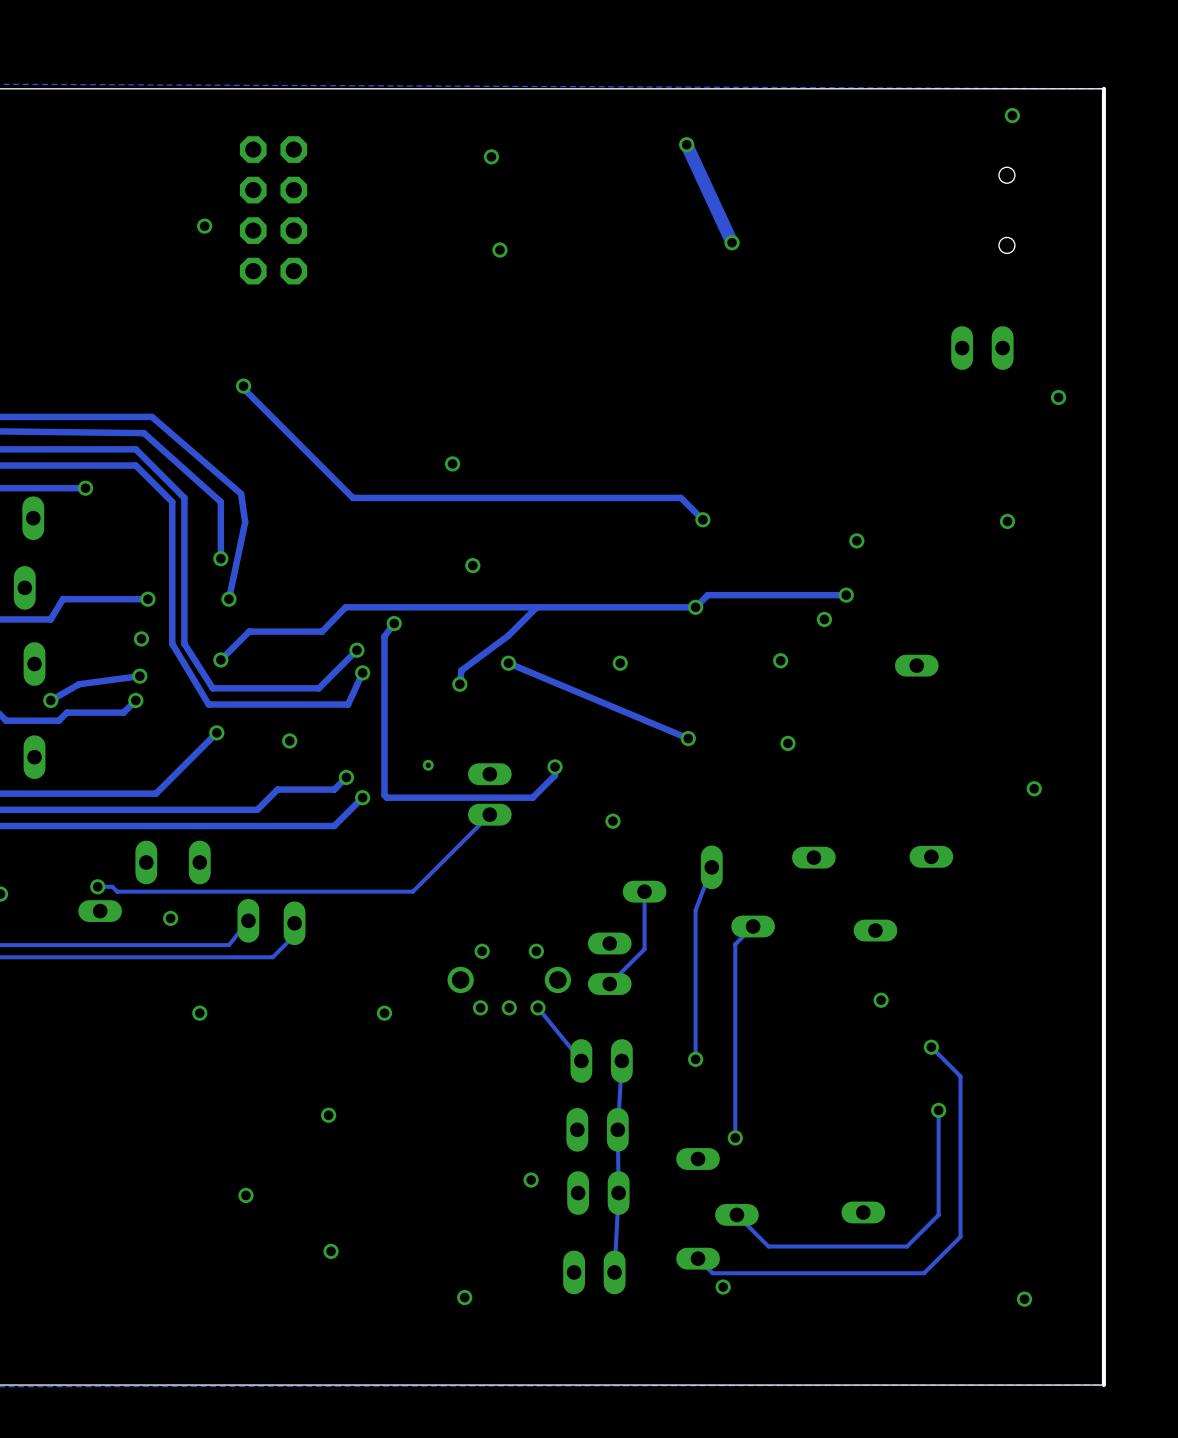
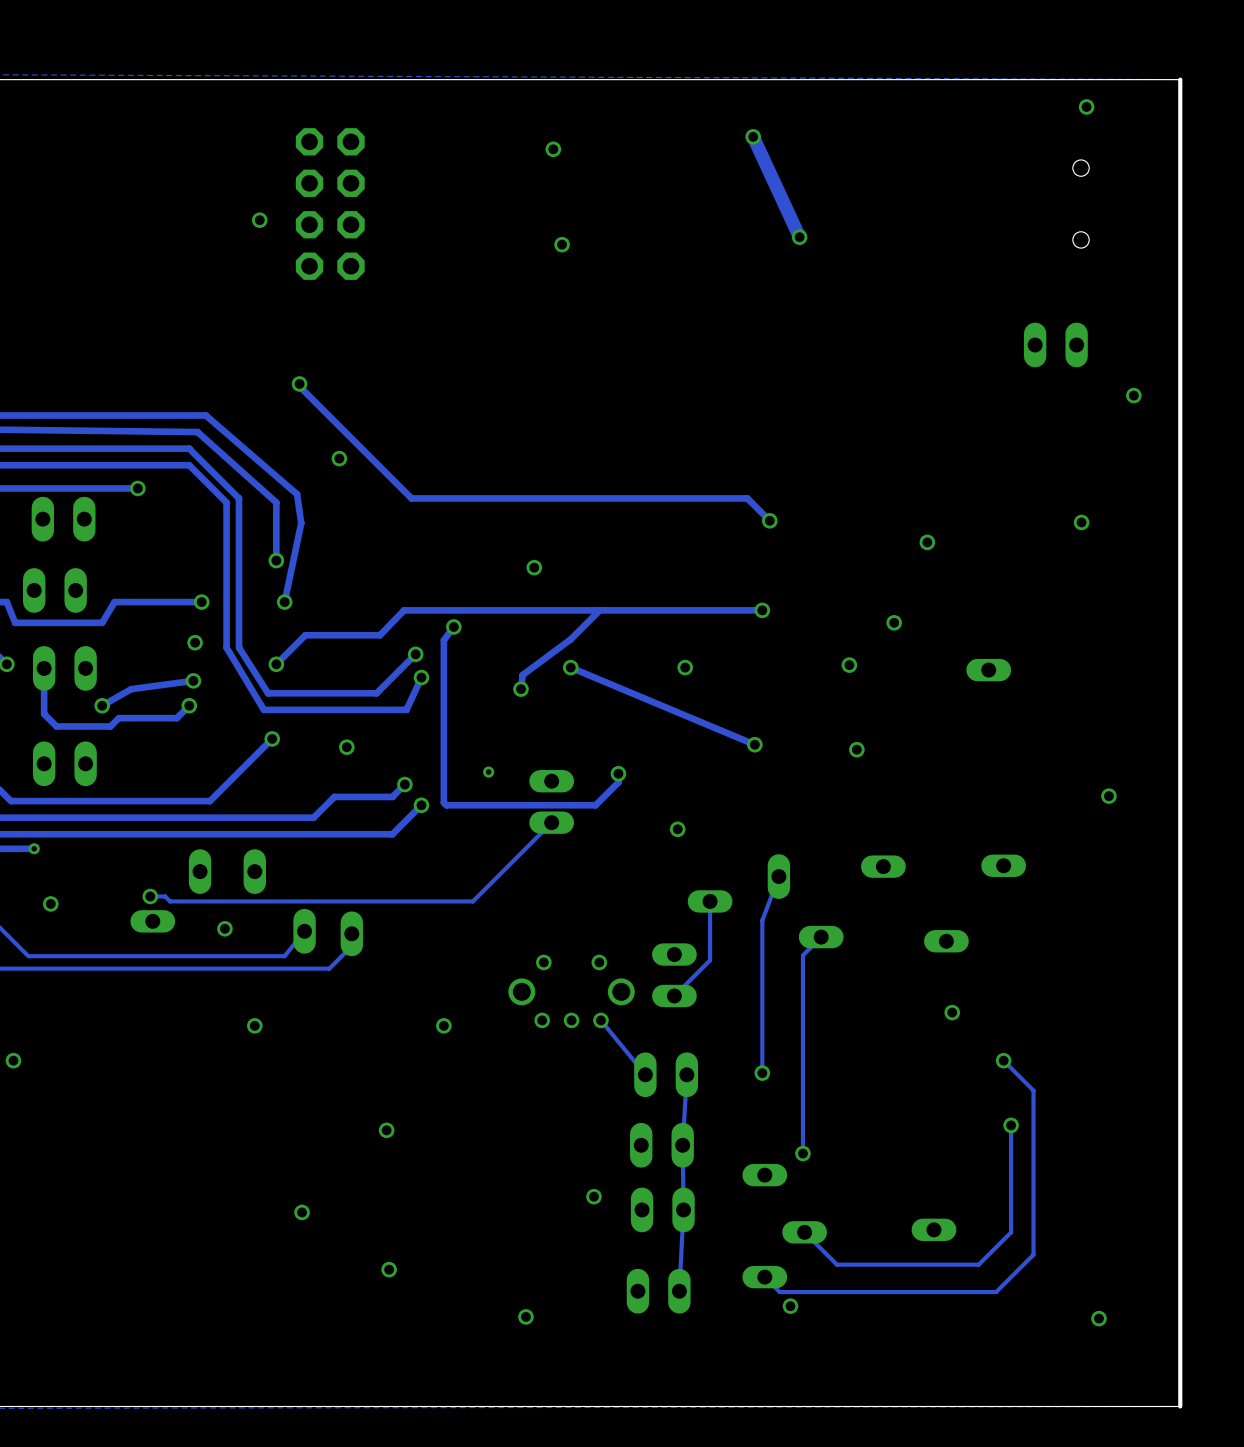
via: none -> (339, 458)
via: (452, 463) -> none
track: (846, 595) (707, 595) (695, 607) -> none
via: (846, 595) -> none

